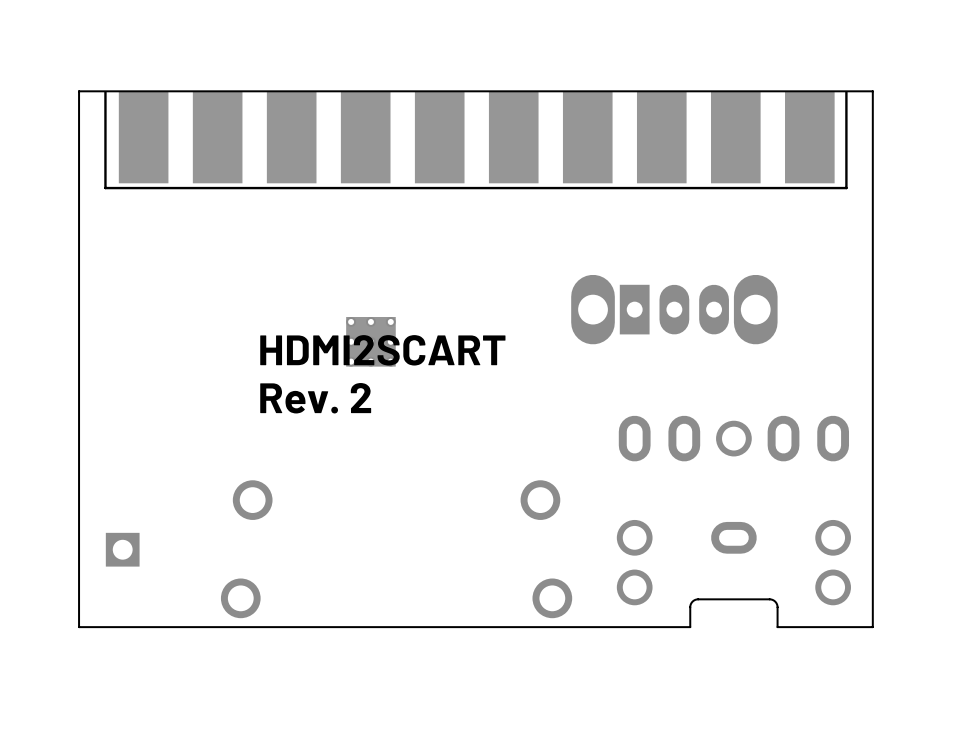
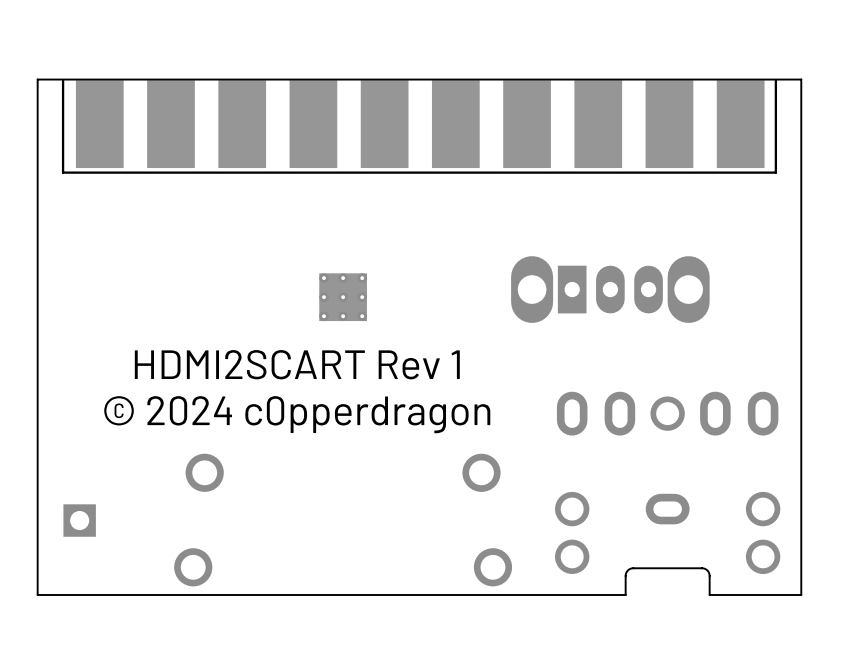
part: none -> (343, 297)
part: (370, 341) -> none
text: HDMI2SCART (382, 350) -> HDMI2SCART Rev 1 (297, 364)
text: Rev. 2 (315, 398) -> none
text: none -> © 2024 c0pperdragon (297, 414)

